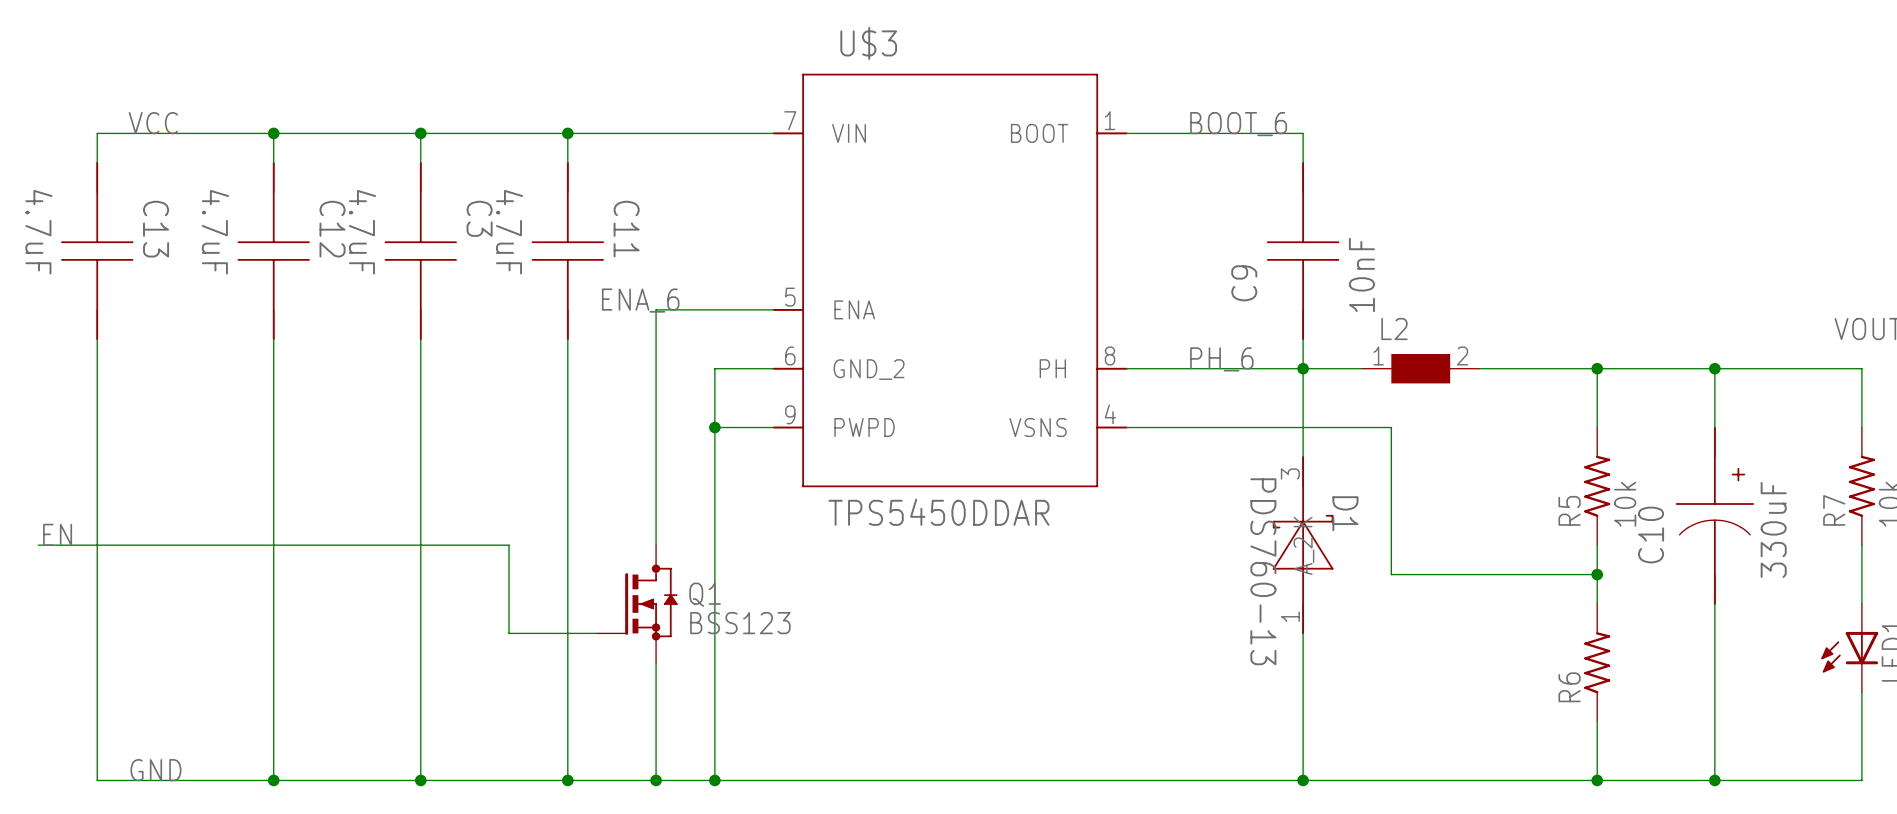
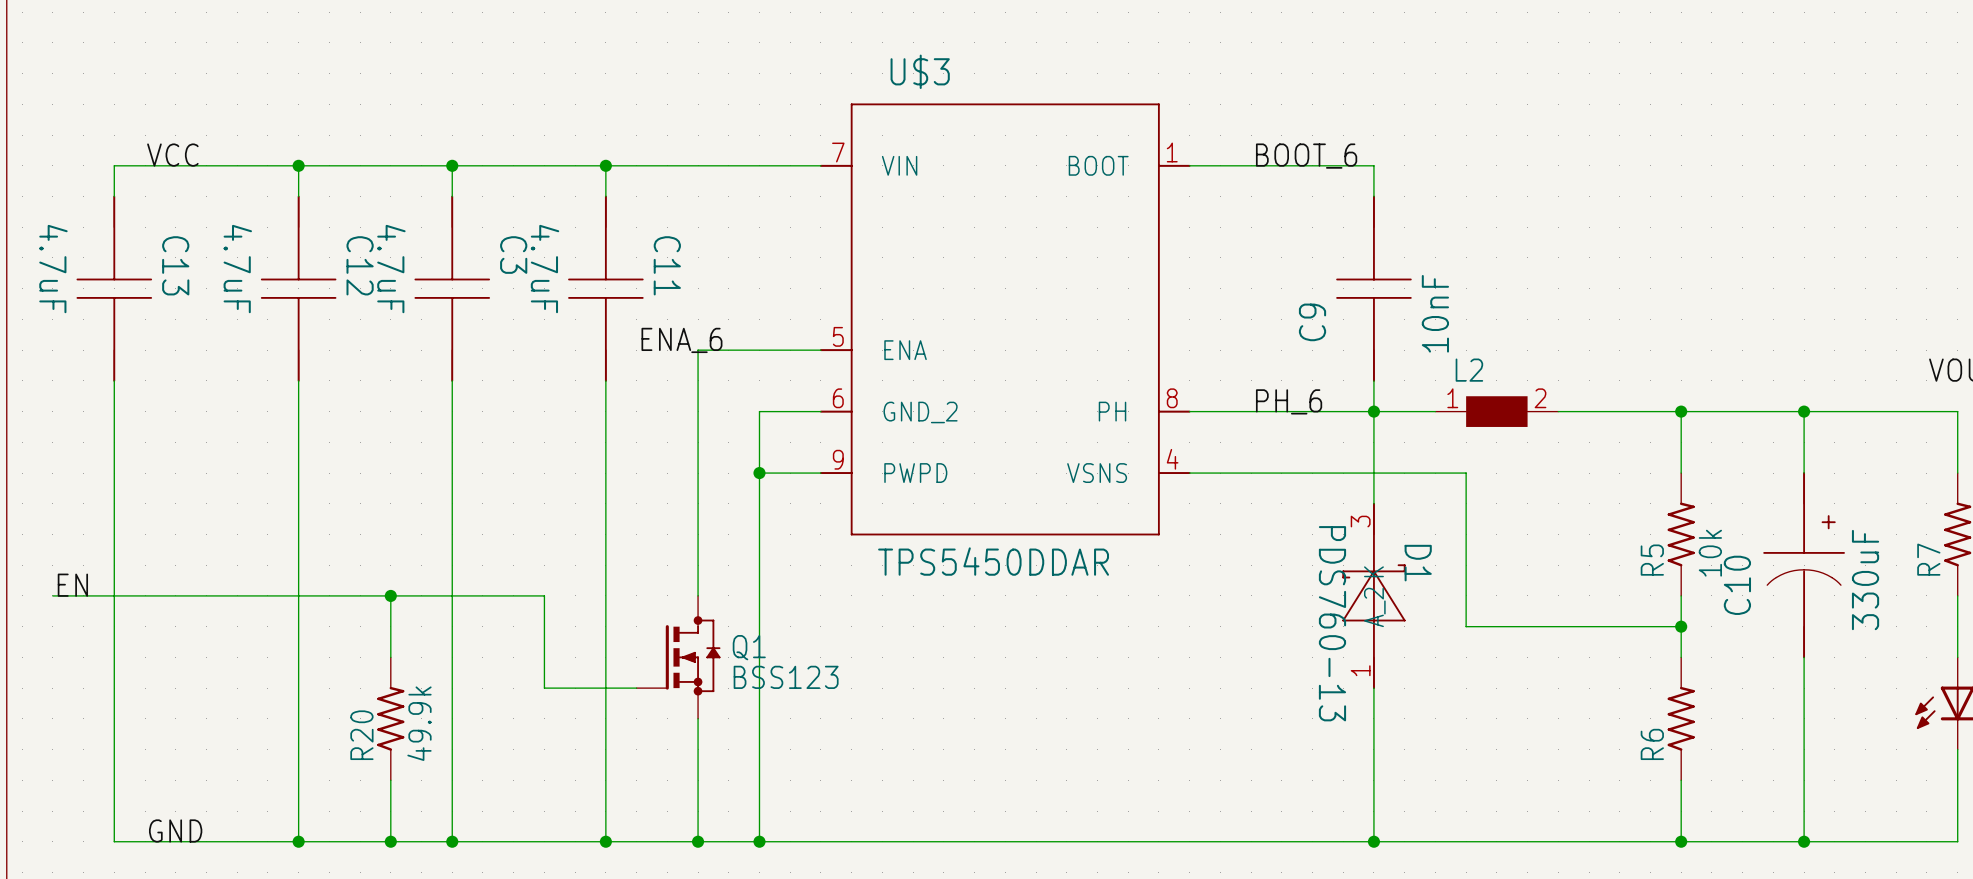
wire: none -> (390, 595) (390, 657)
junction: none -> (390, 595)
R20: none -> 49.9k (390, 718)
wire: none -> (390, 780) (390, 841)
junction: none -> (390, 841)

